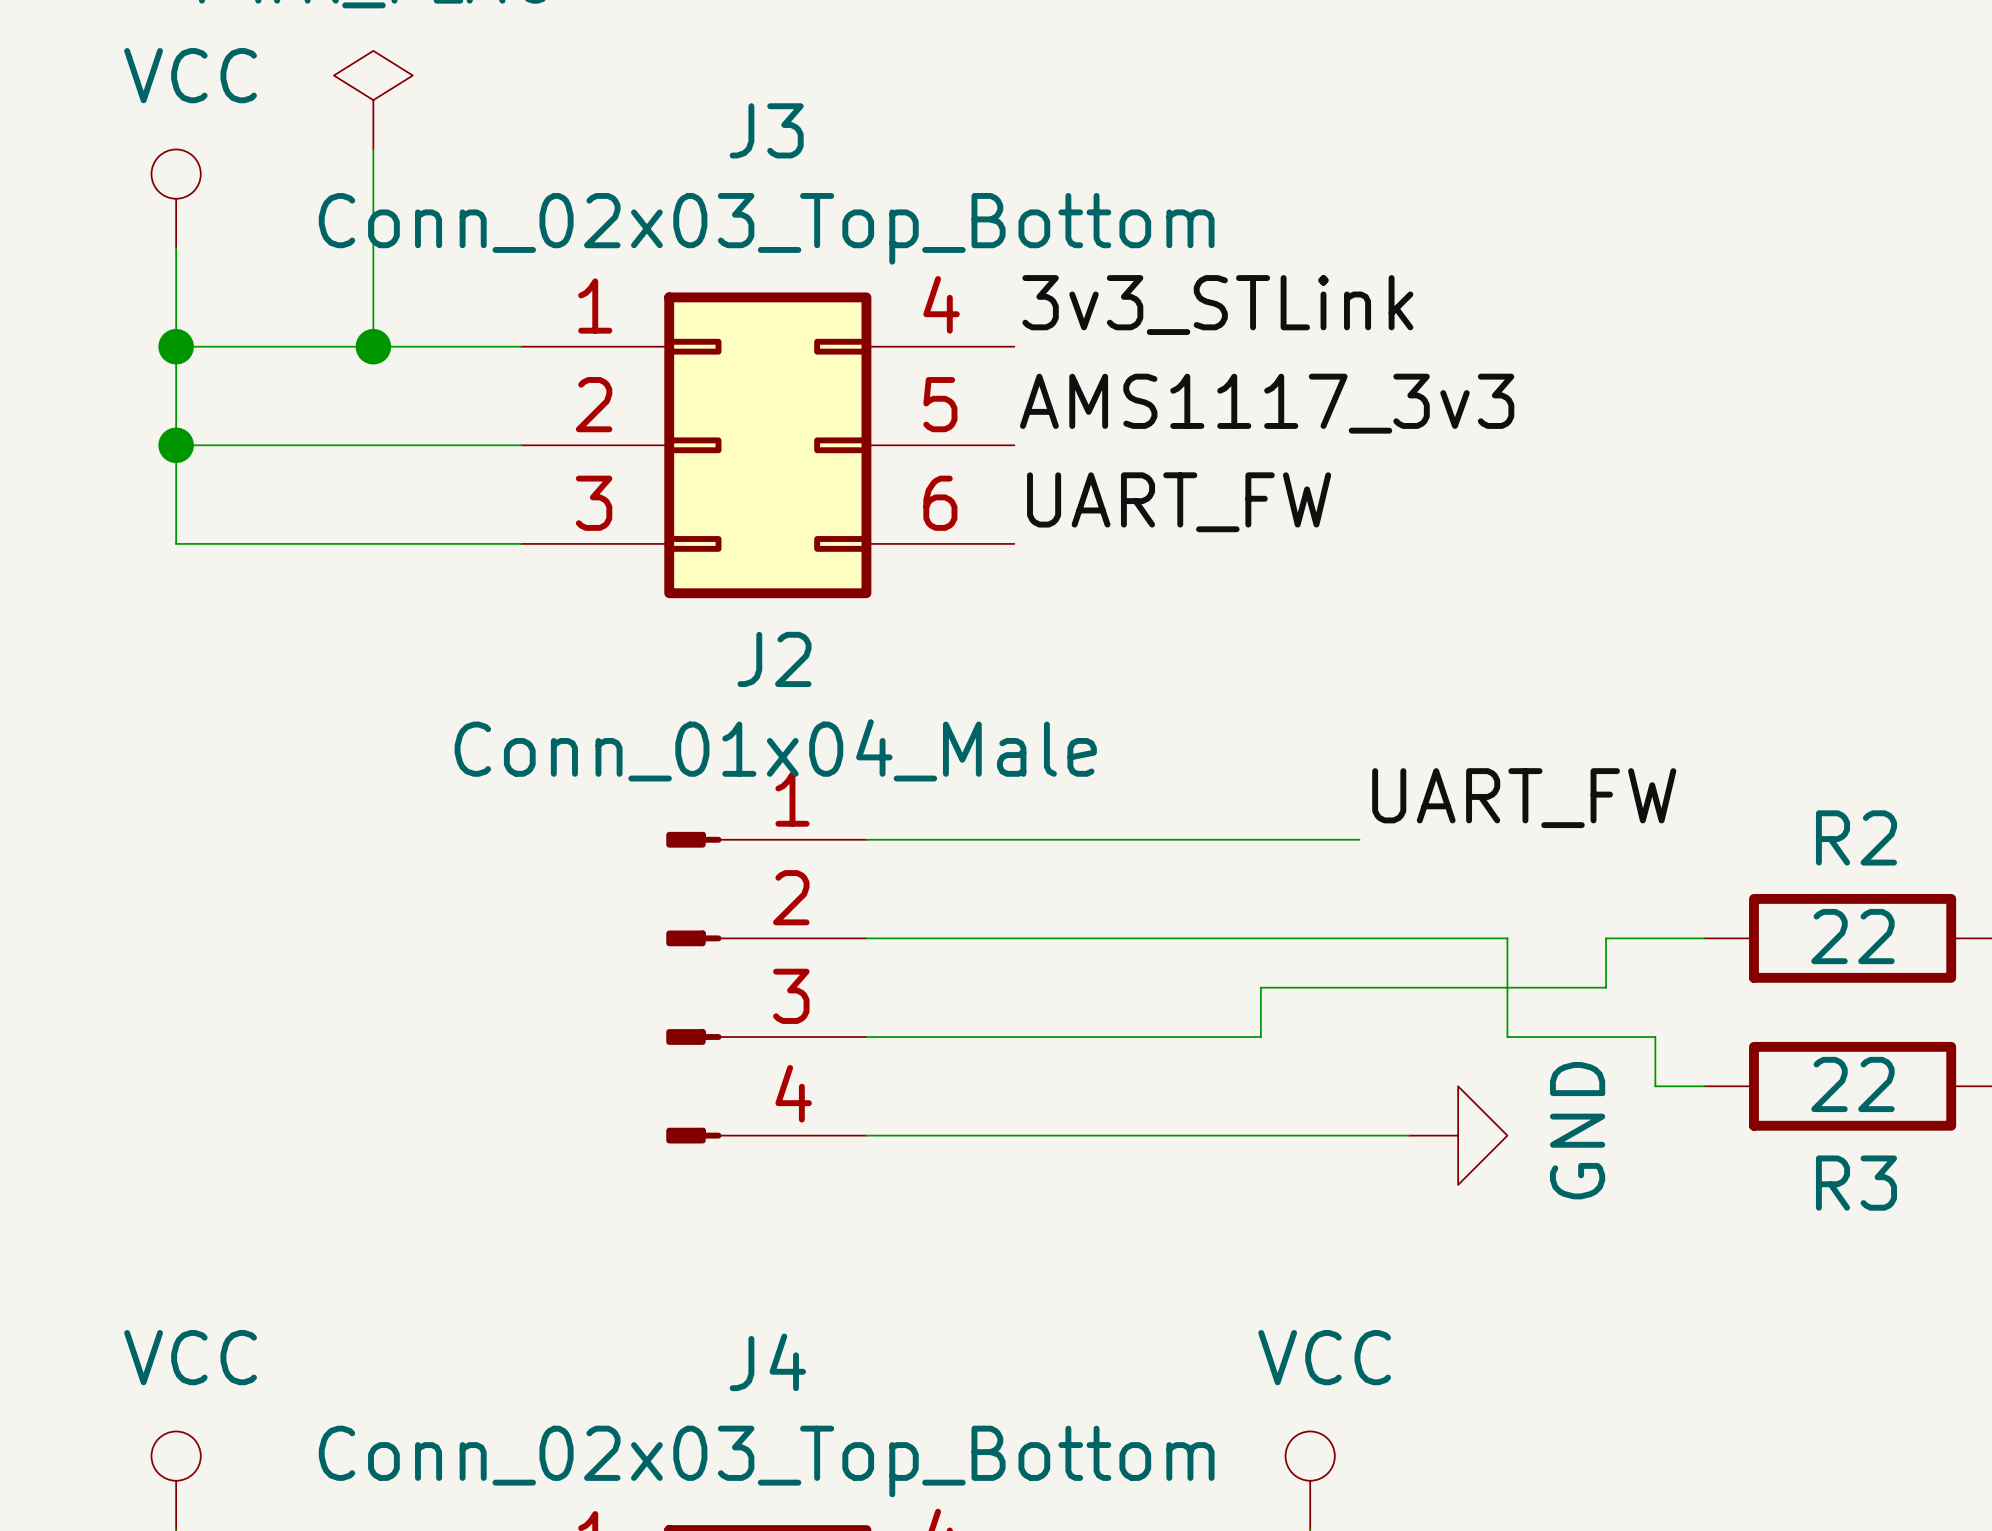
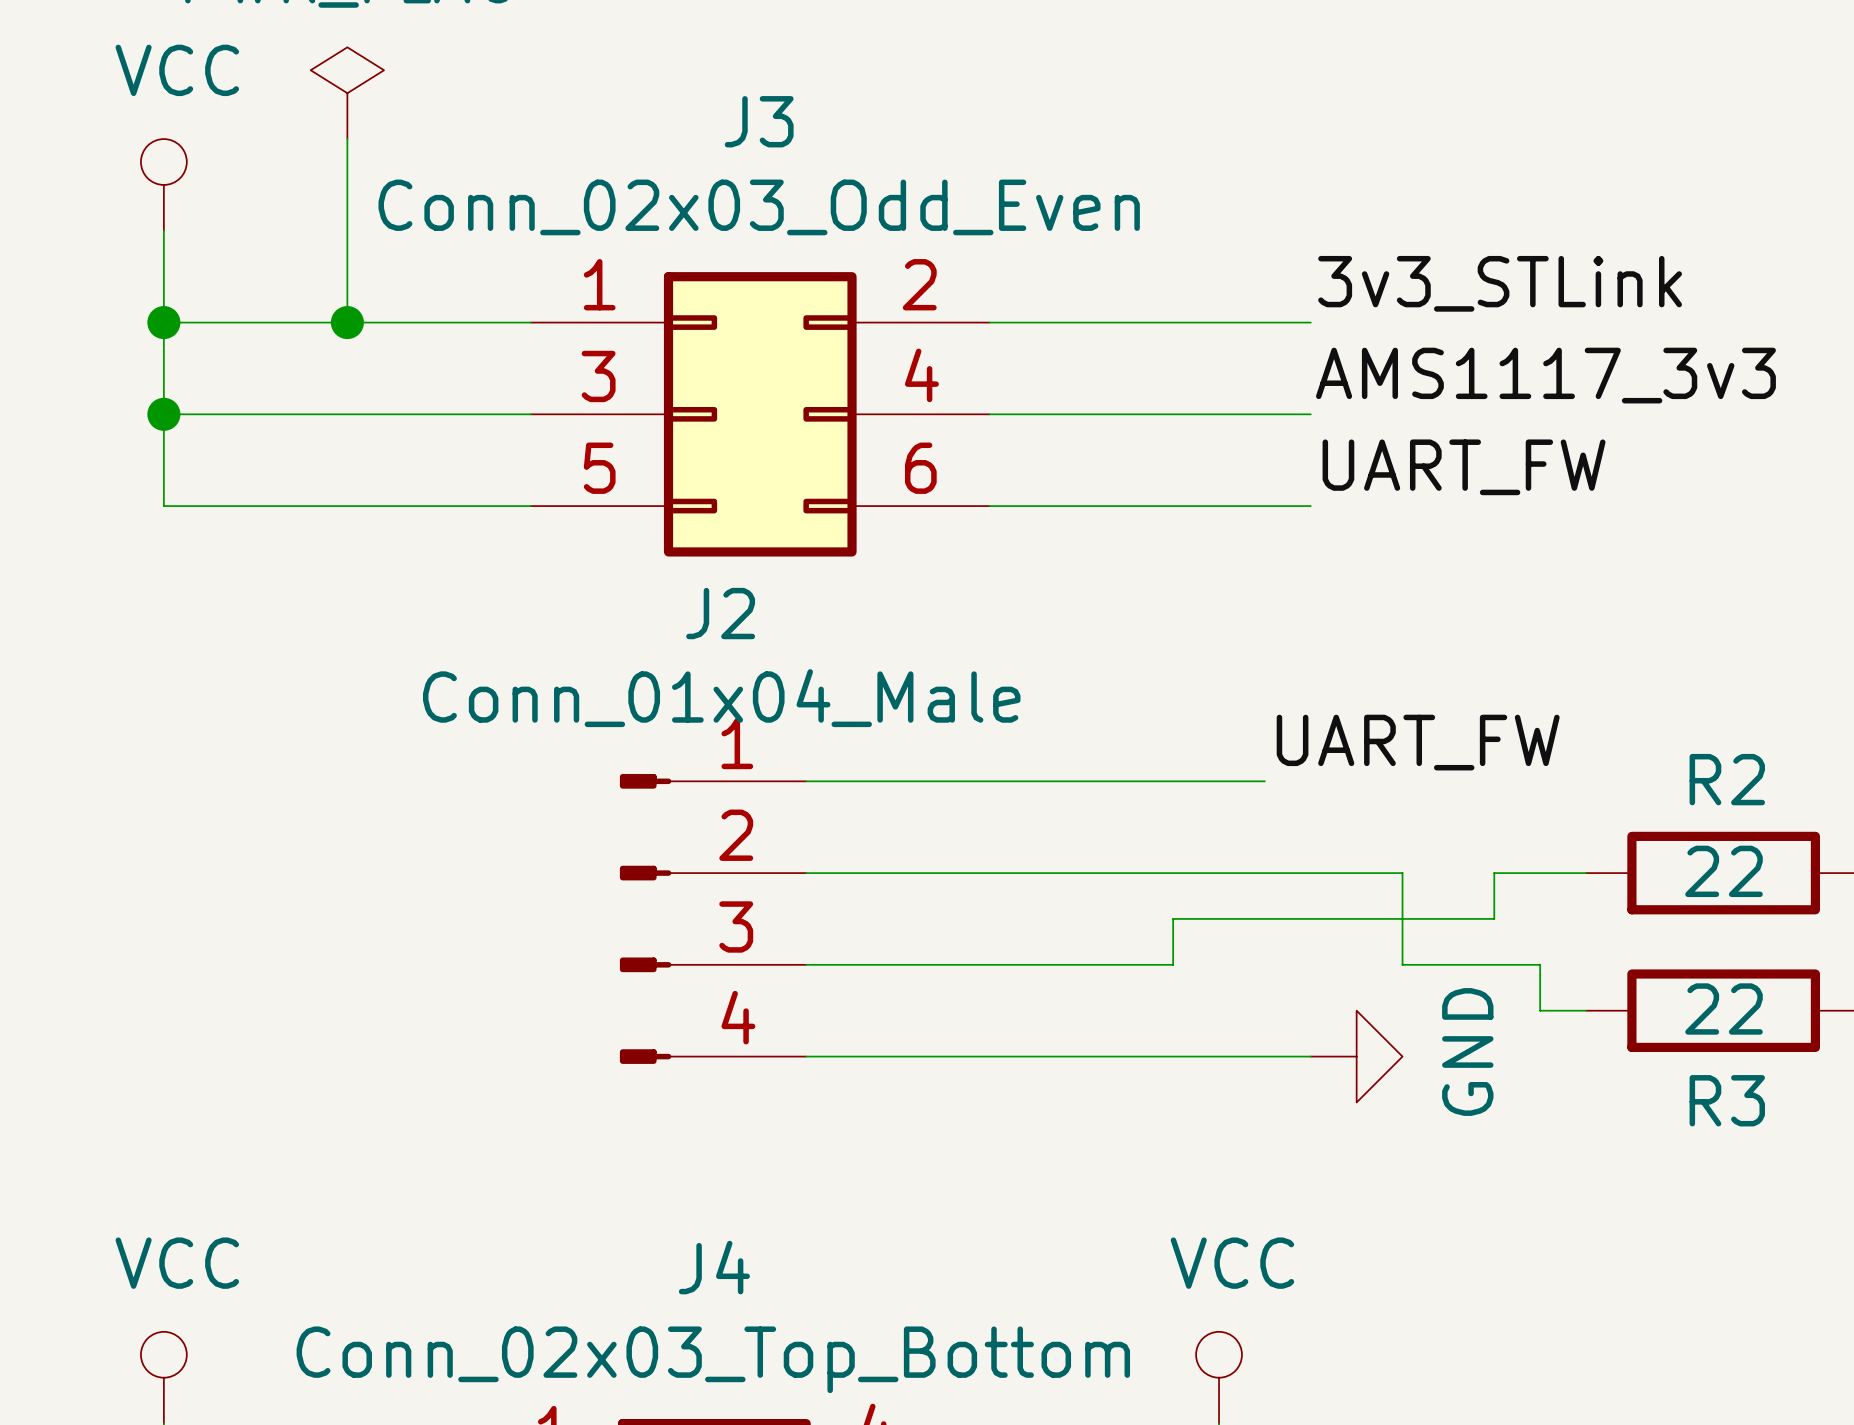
J3 value: Conn_02x03_Top_Bottom (766, 228) -> Conn_02x03_Odd_Even (759, 207)
J3 pin number: 4 (941, 304) -> 2 (919, 284)
label position: 3v3_STLink (1217, 305) -> 3v3_STLink (1500, 283)
wire: none -> (989, 322) (1310, 322)
label position: AMS1117_3v3 (1267, 403) -> AMS1117_3v3 (1545, 375)
J3 pin number: 2 (594, 404) -> 3 (598, 376)
J3 pin number: 5 (940, 404) -> 4 (921, 375)
J3 position: (767, 445) -> (760, 414)
wire: none -> (989, 414) (1310, 414)
label position: UART_FW (1179, 502) -> UART_FW (1464, 467)
J3 pin number: 3 (594, 503) -> 5 (599, 468)
wire: none -> (989, 506) (1310, 506)

